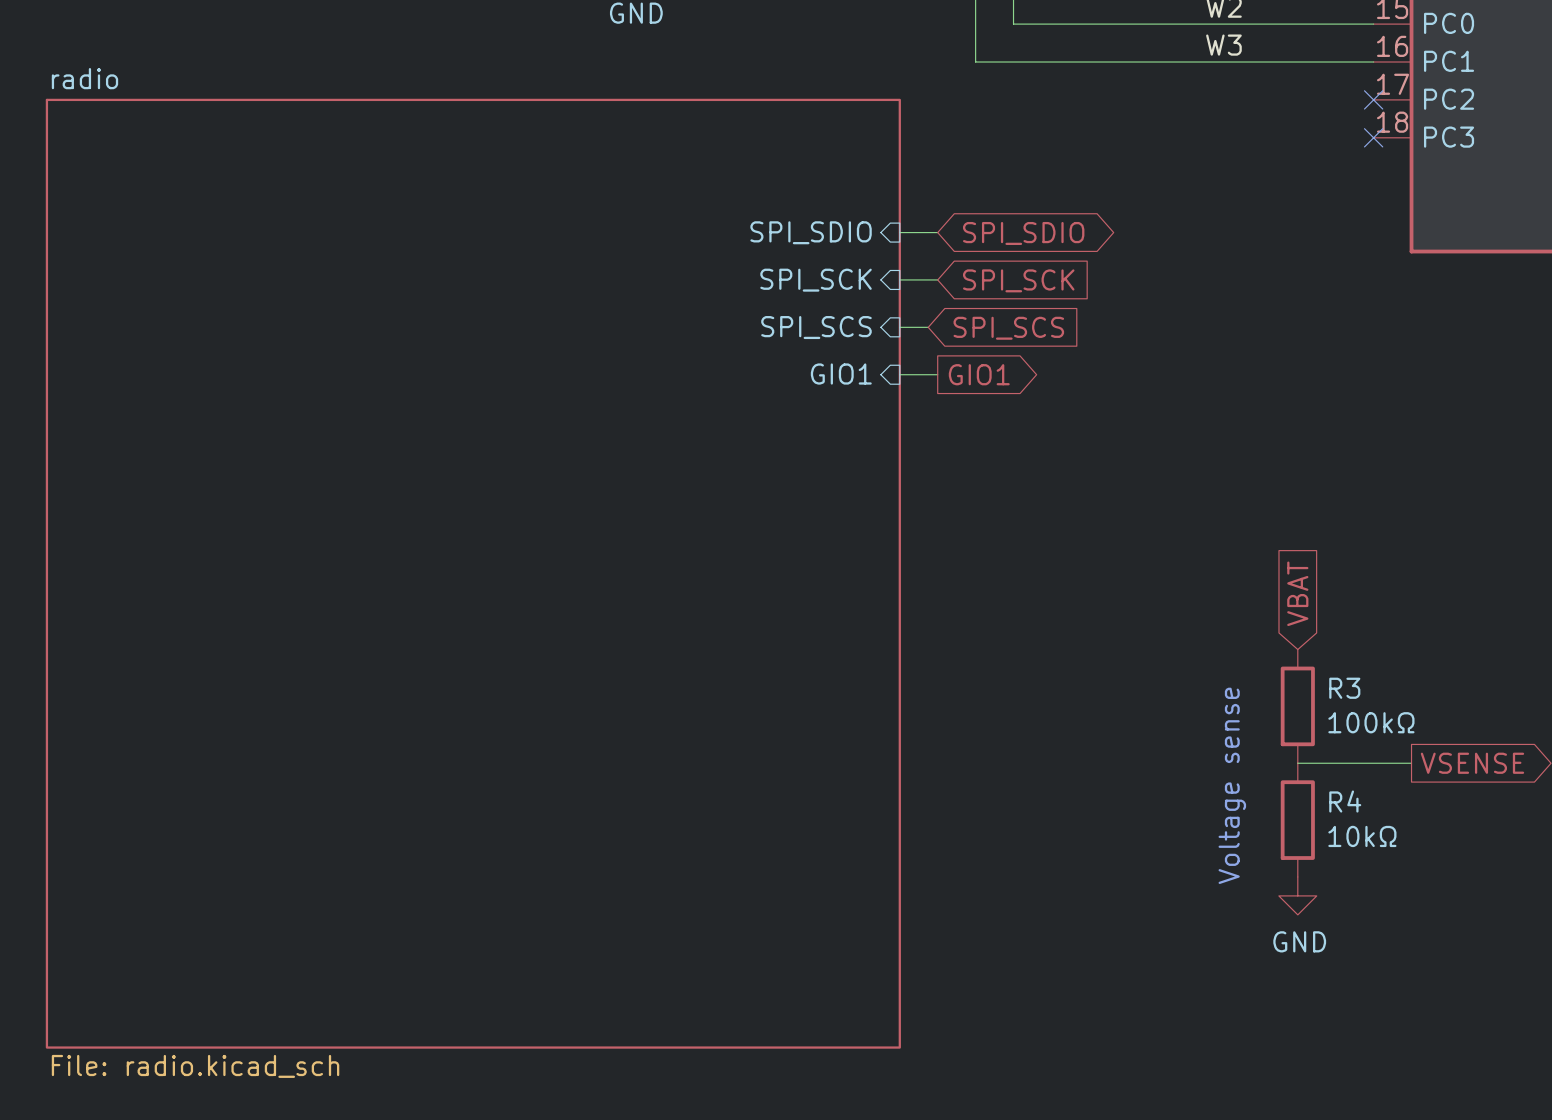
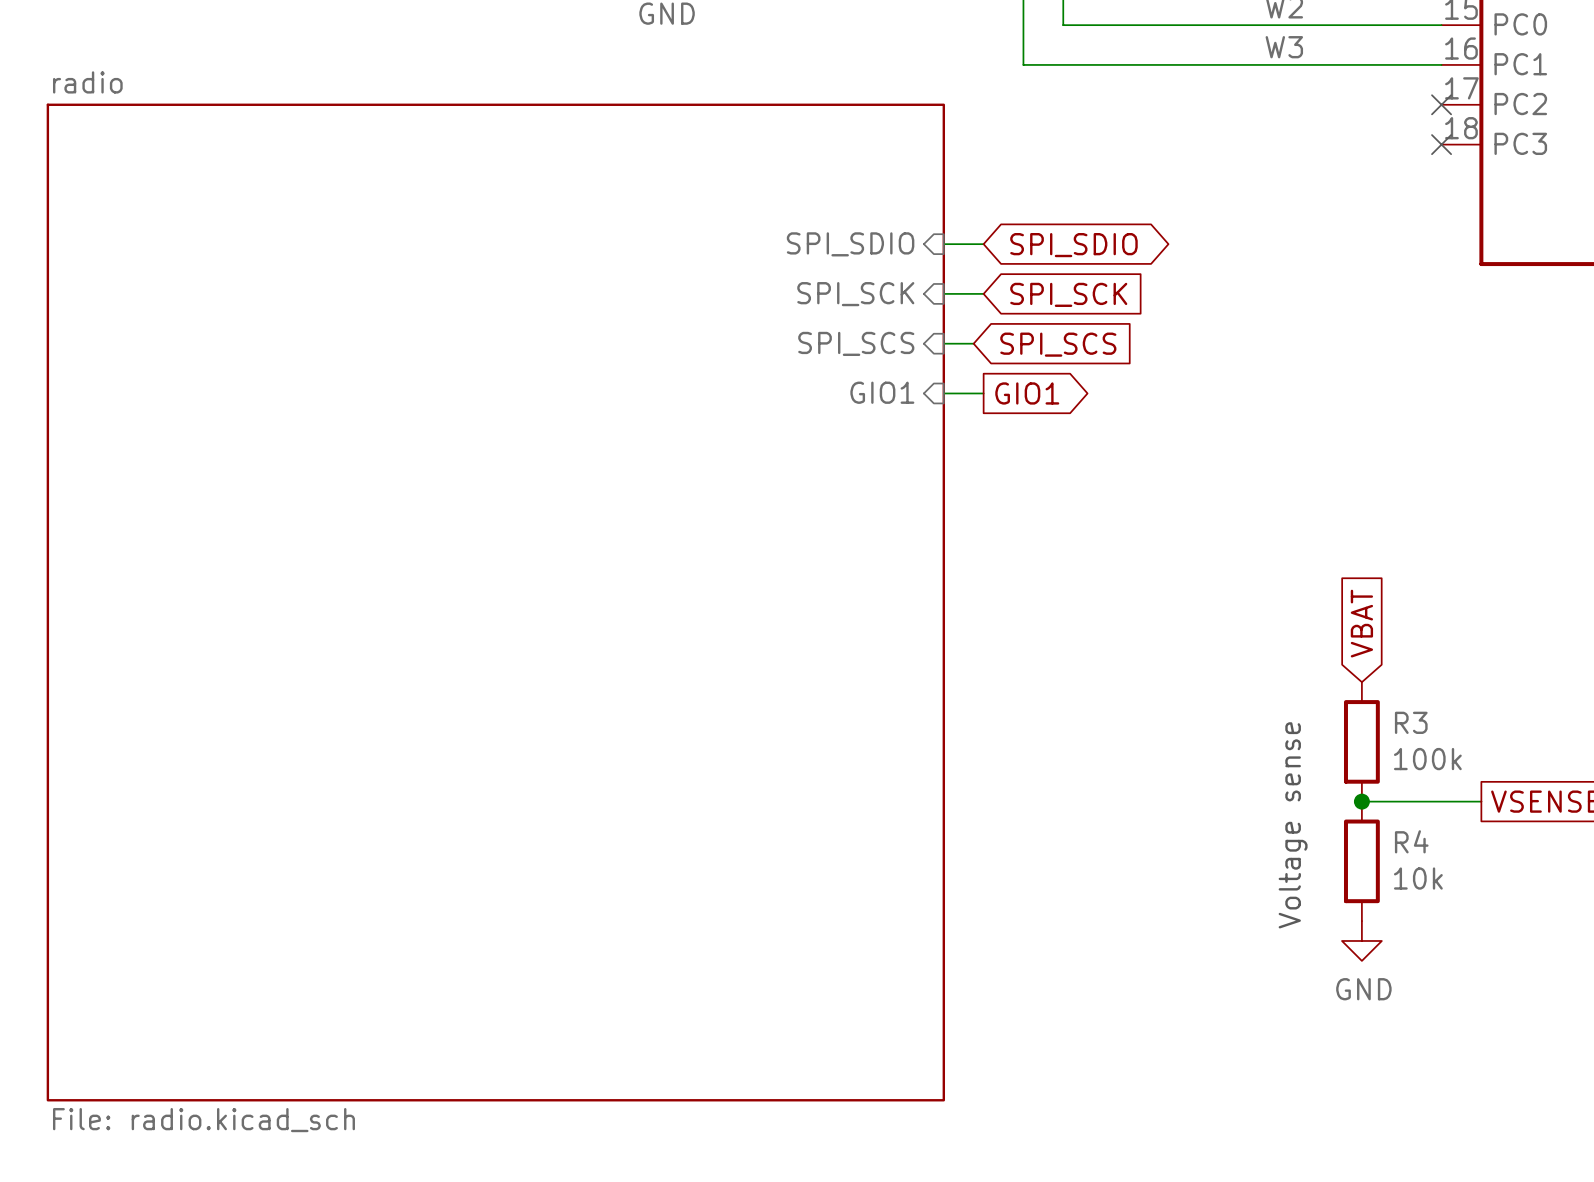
R3 value: 100kΩ (1371, 722) -> 100k (1427, 759)
junction: none -> (1361, 801)
R4 value: 10kΩ (1362, 836) -> 10k (1418, 878)

